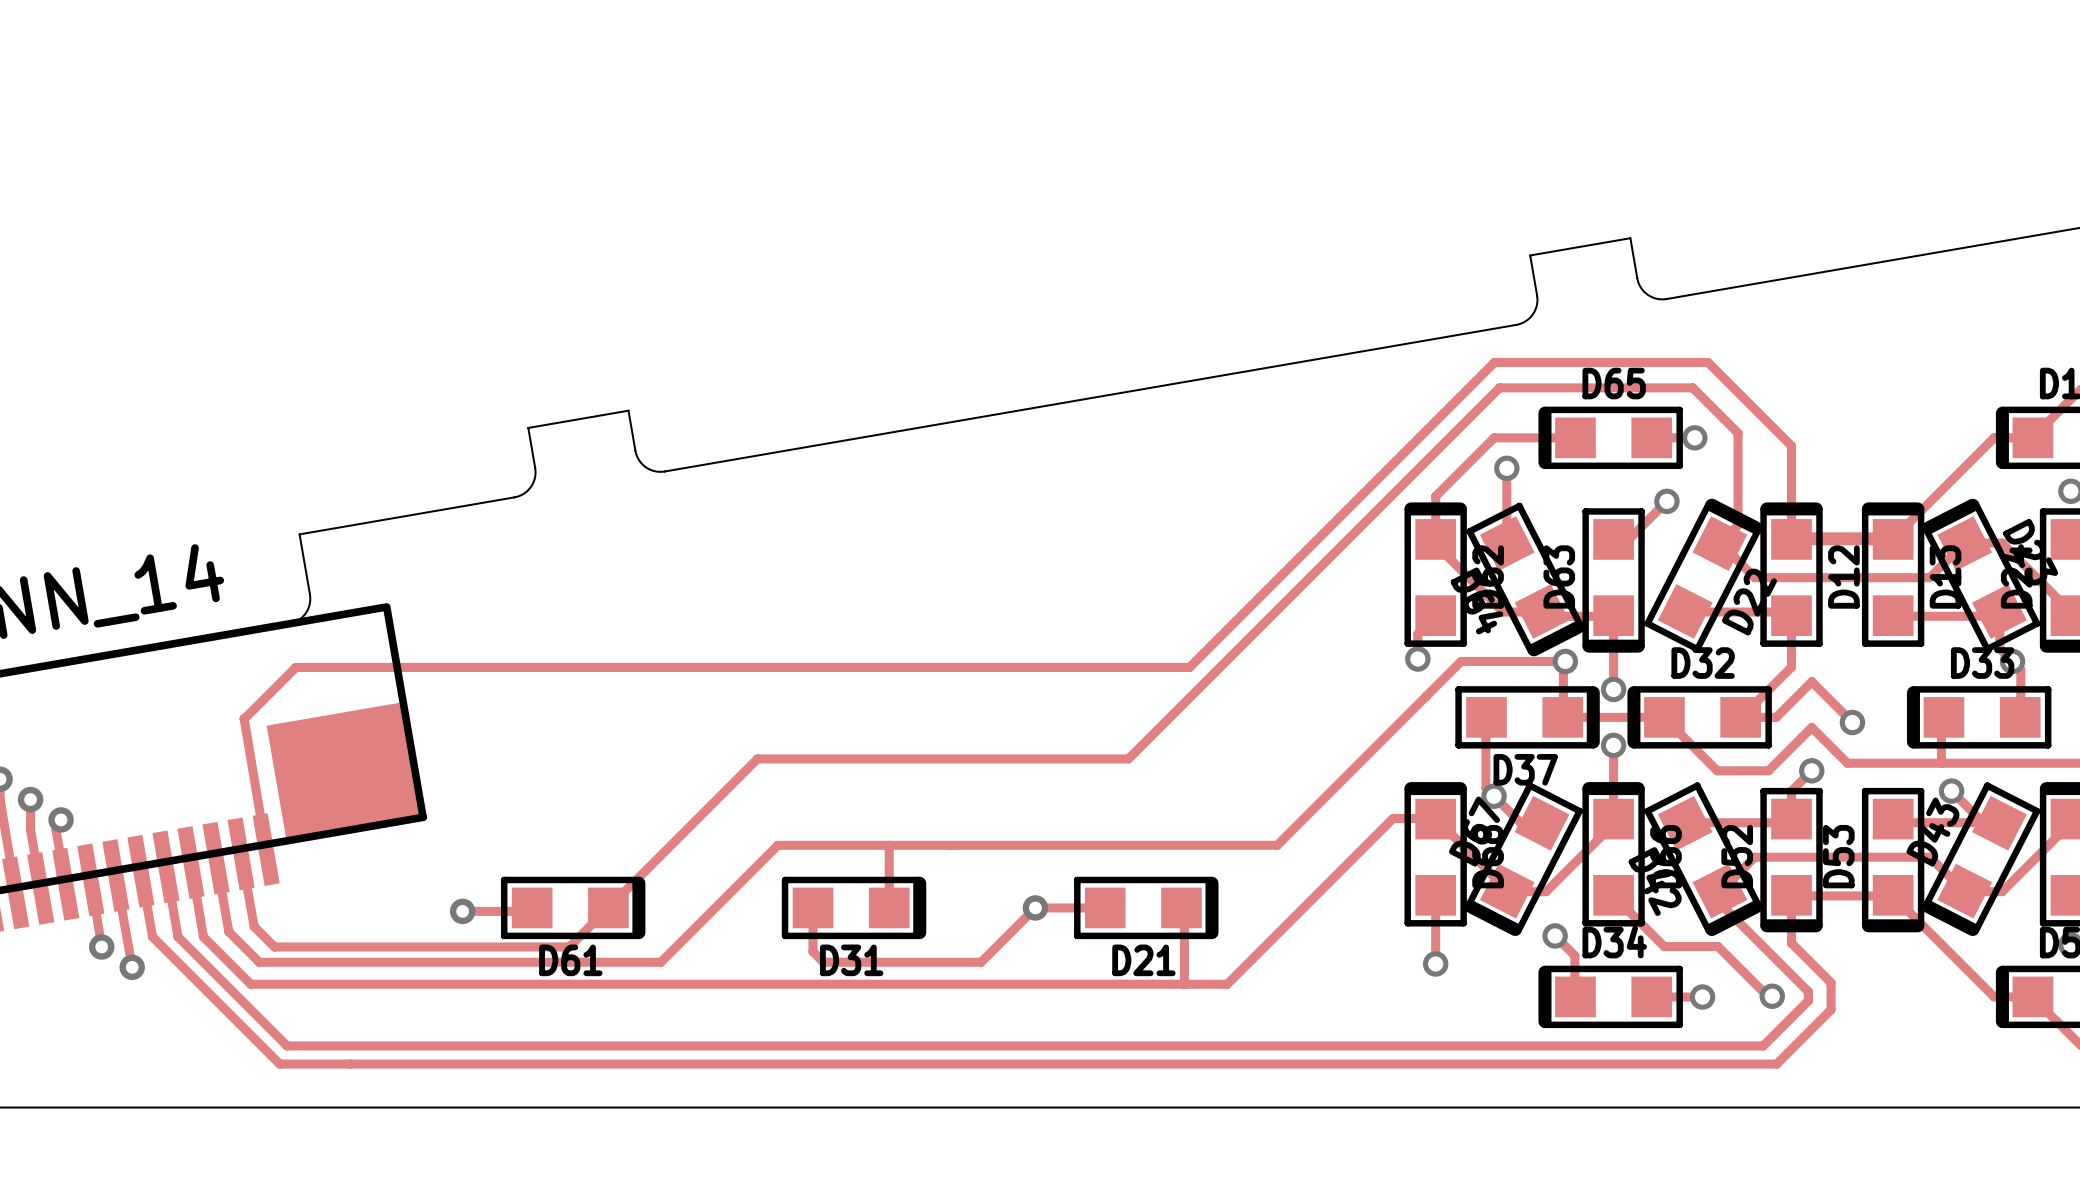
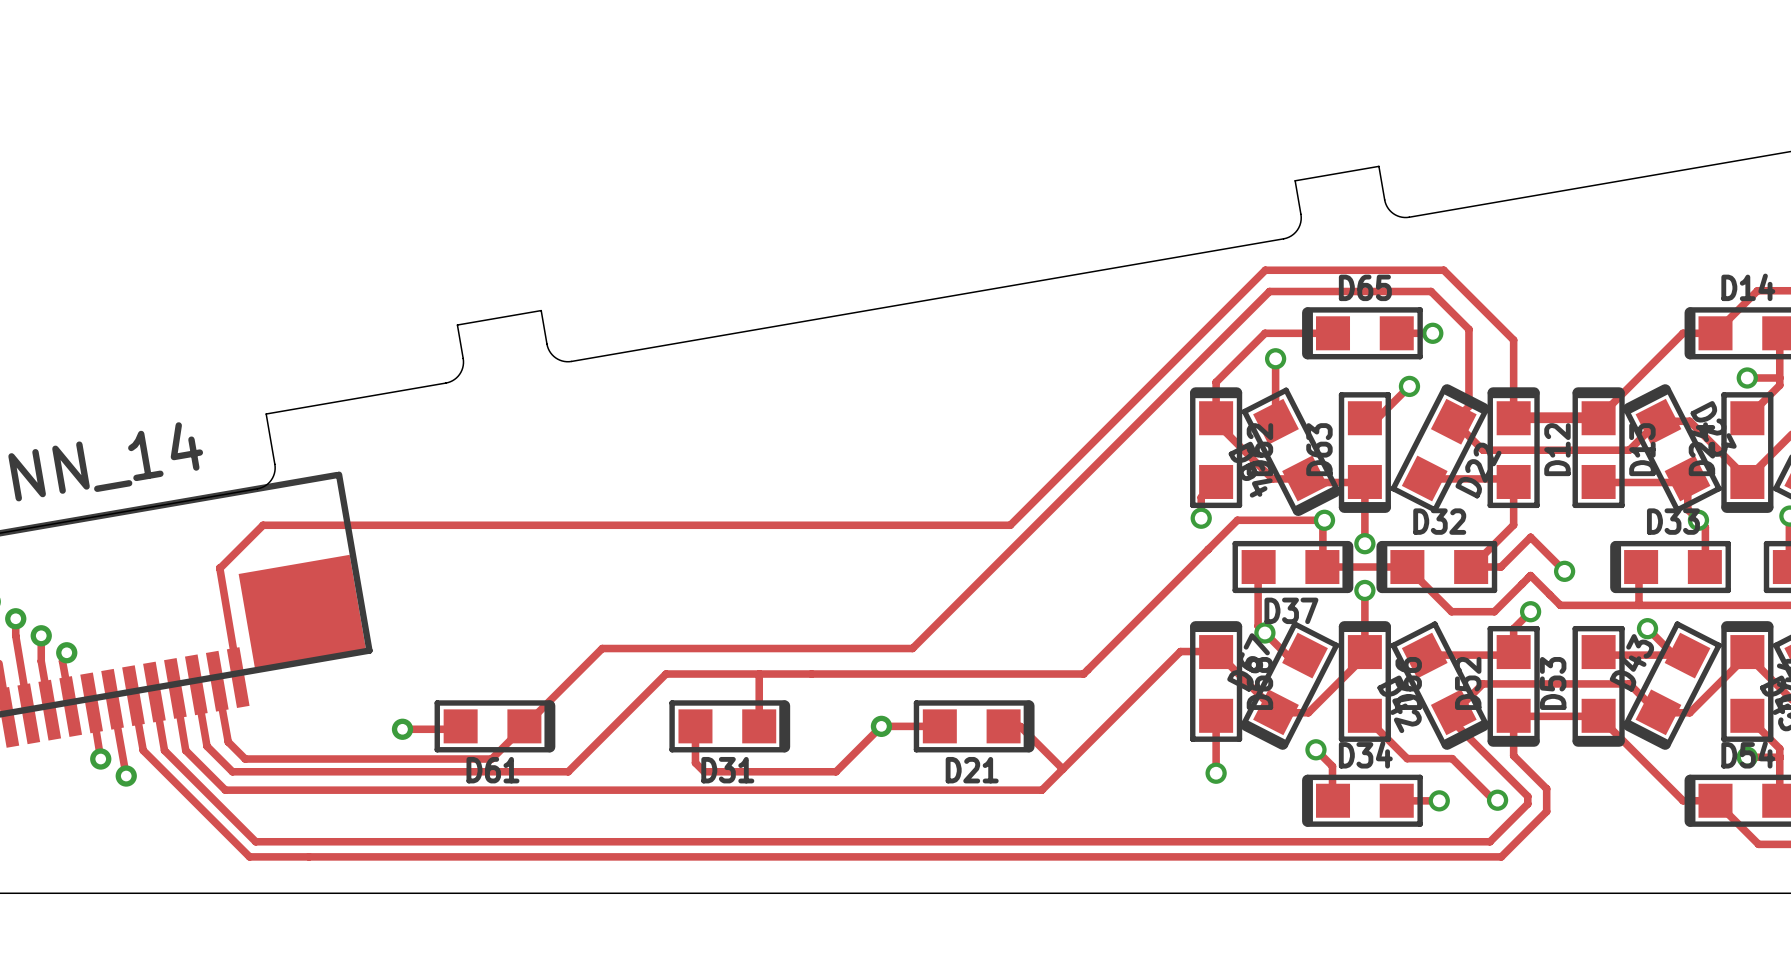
track: (1128, 758) (757, 758) (701, 814) -> (959, 601) (912, 648) (602, 648)
track: (1181, 907) (1184, 910) (1184, 984) -> (1003, 726) (1020, 726) (1062, 769)

